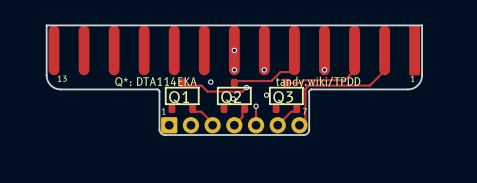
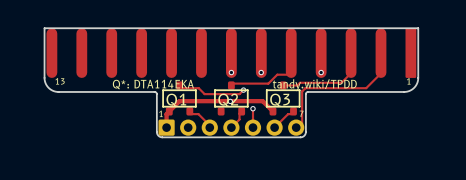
via: (234, 50) -> none
via: (210, 82) -> none
via: (266, 95) -> none
track: none -> (272, 111) (262, 101) (179, 101) (166, 114) (166, 127)

